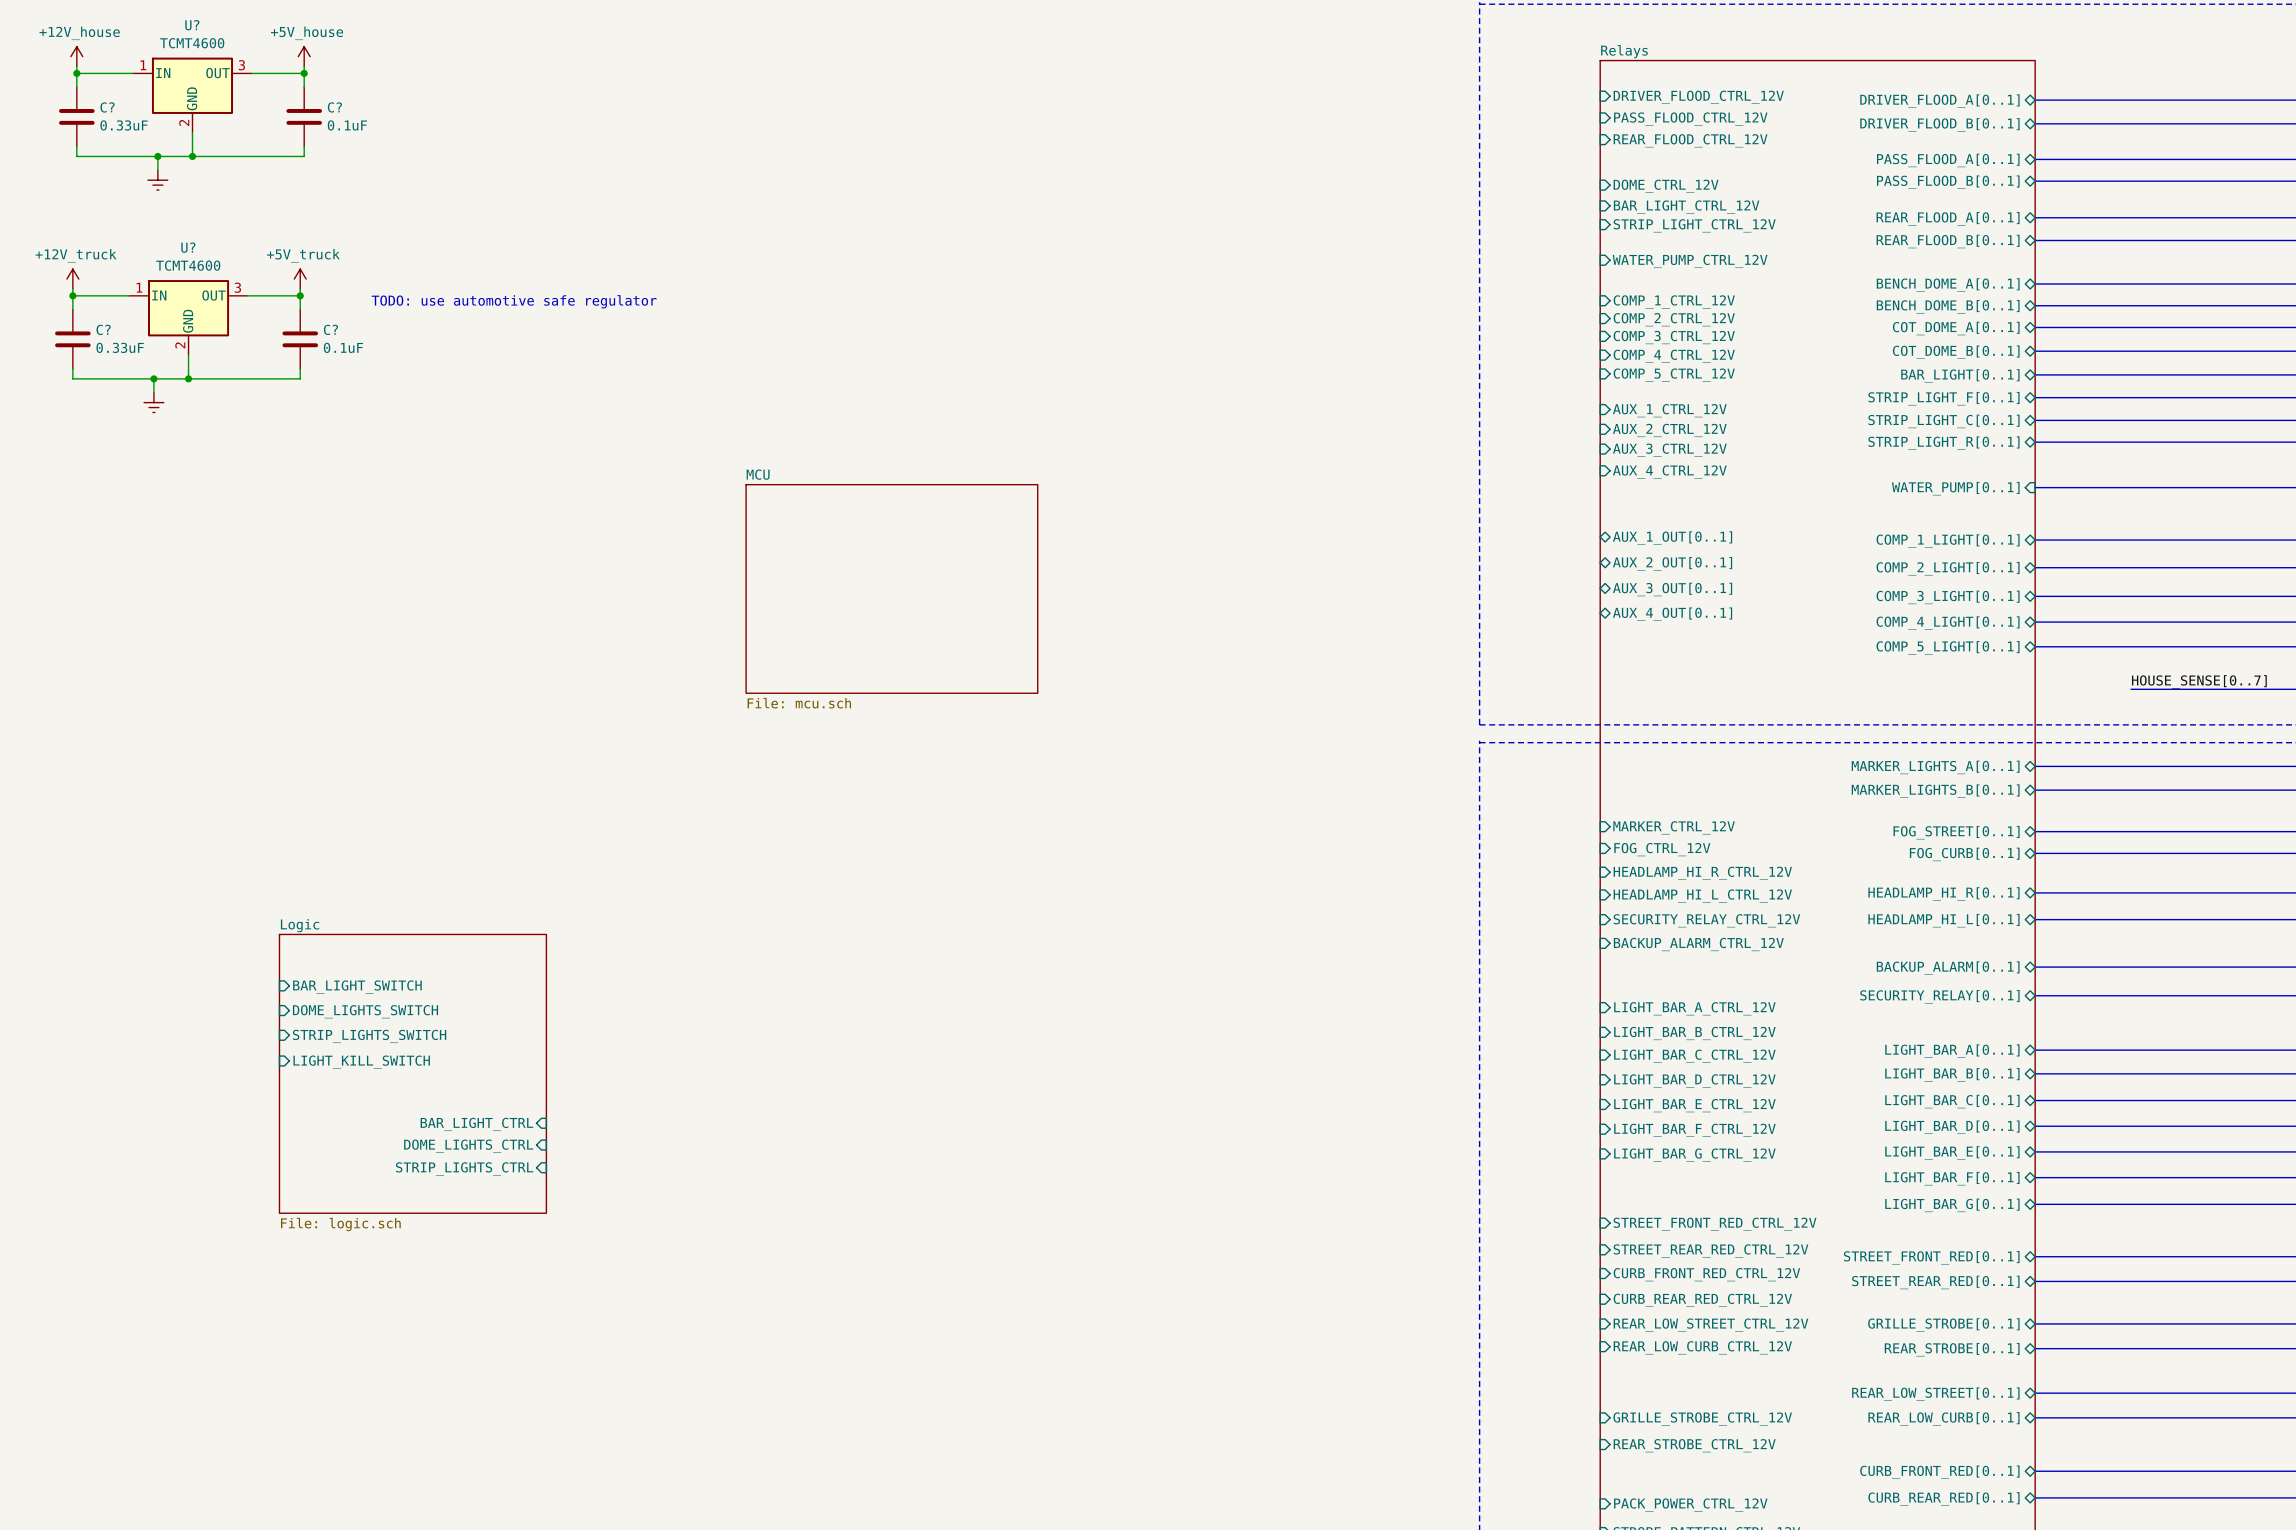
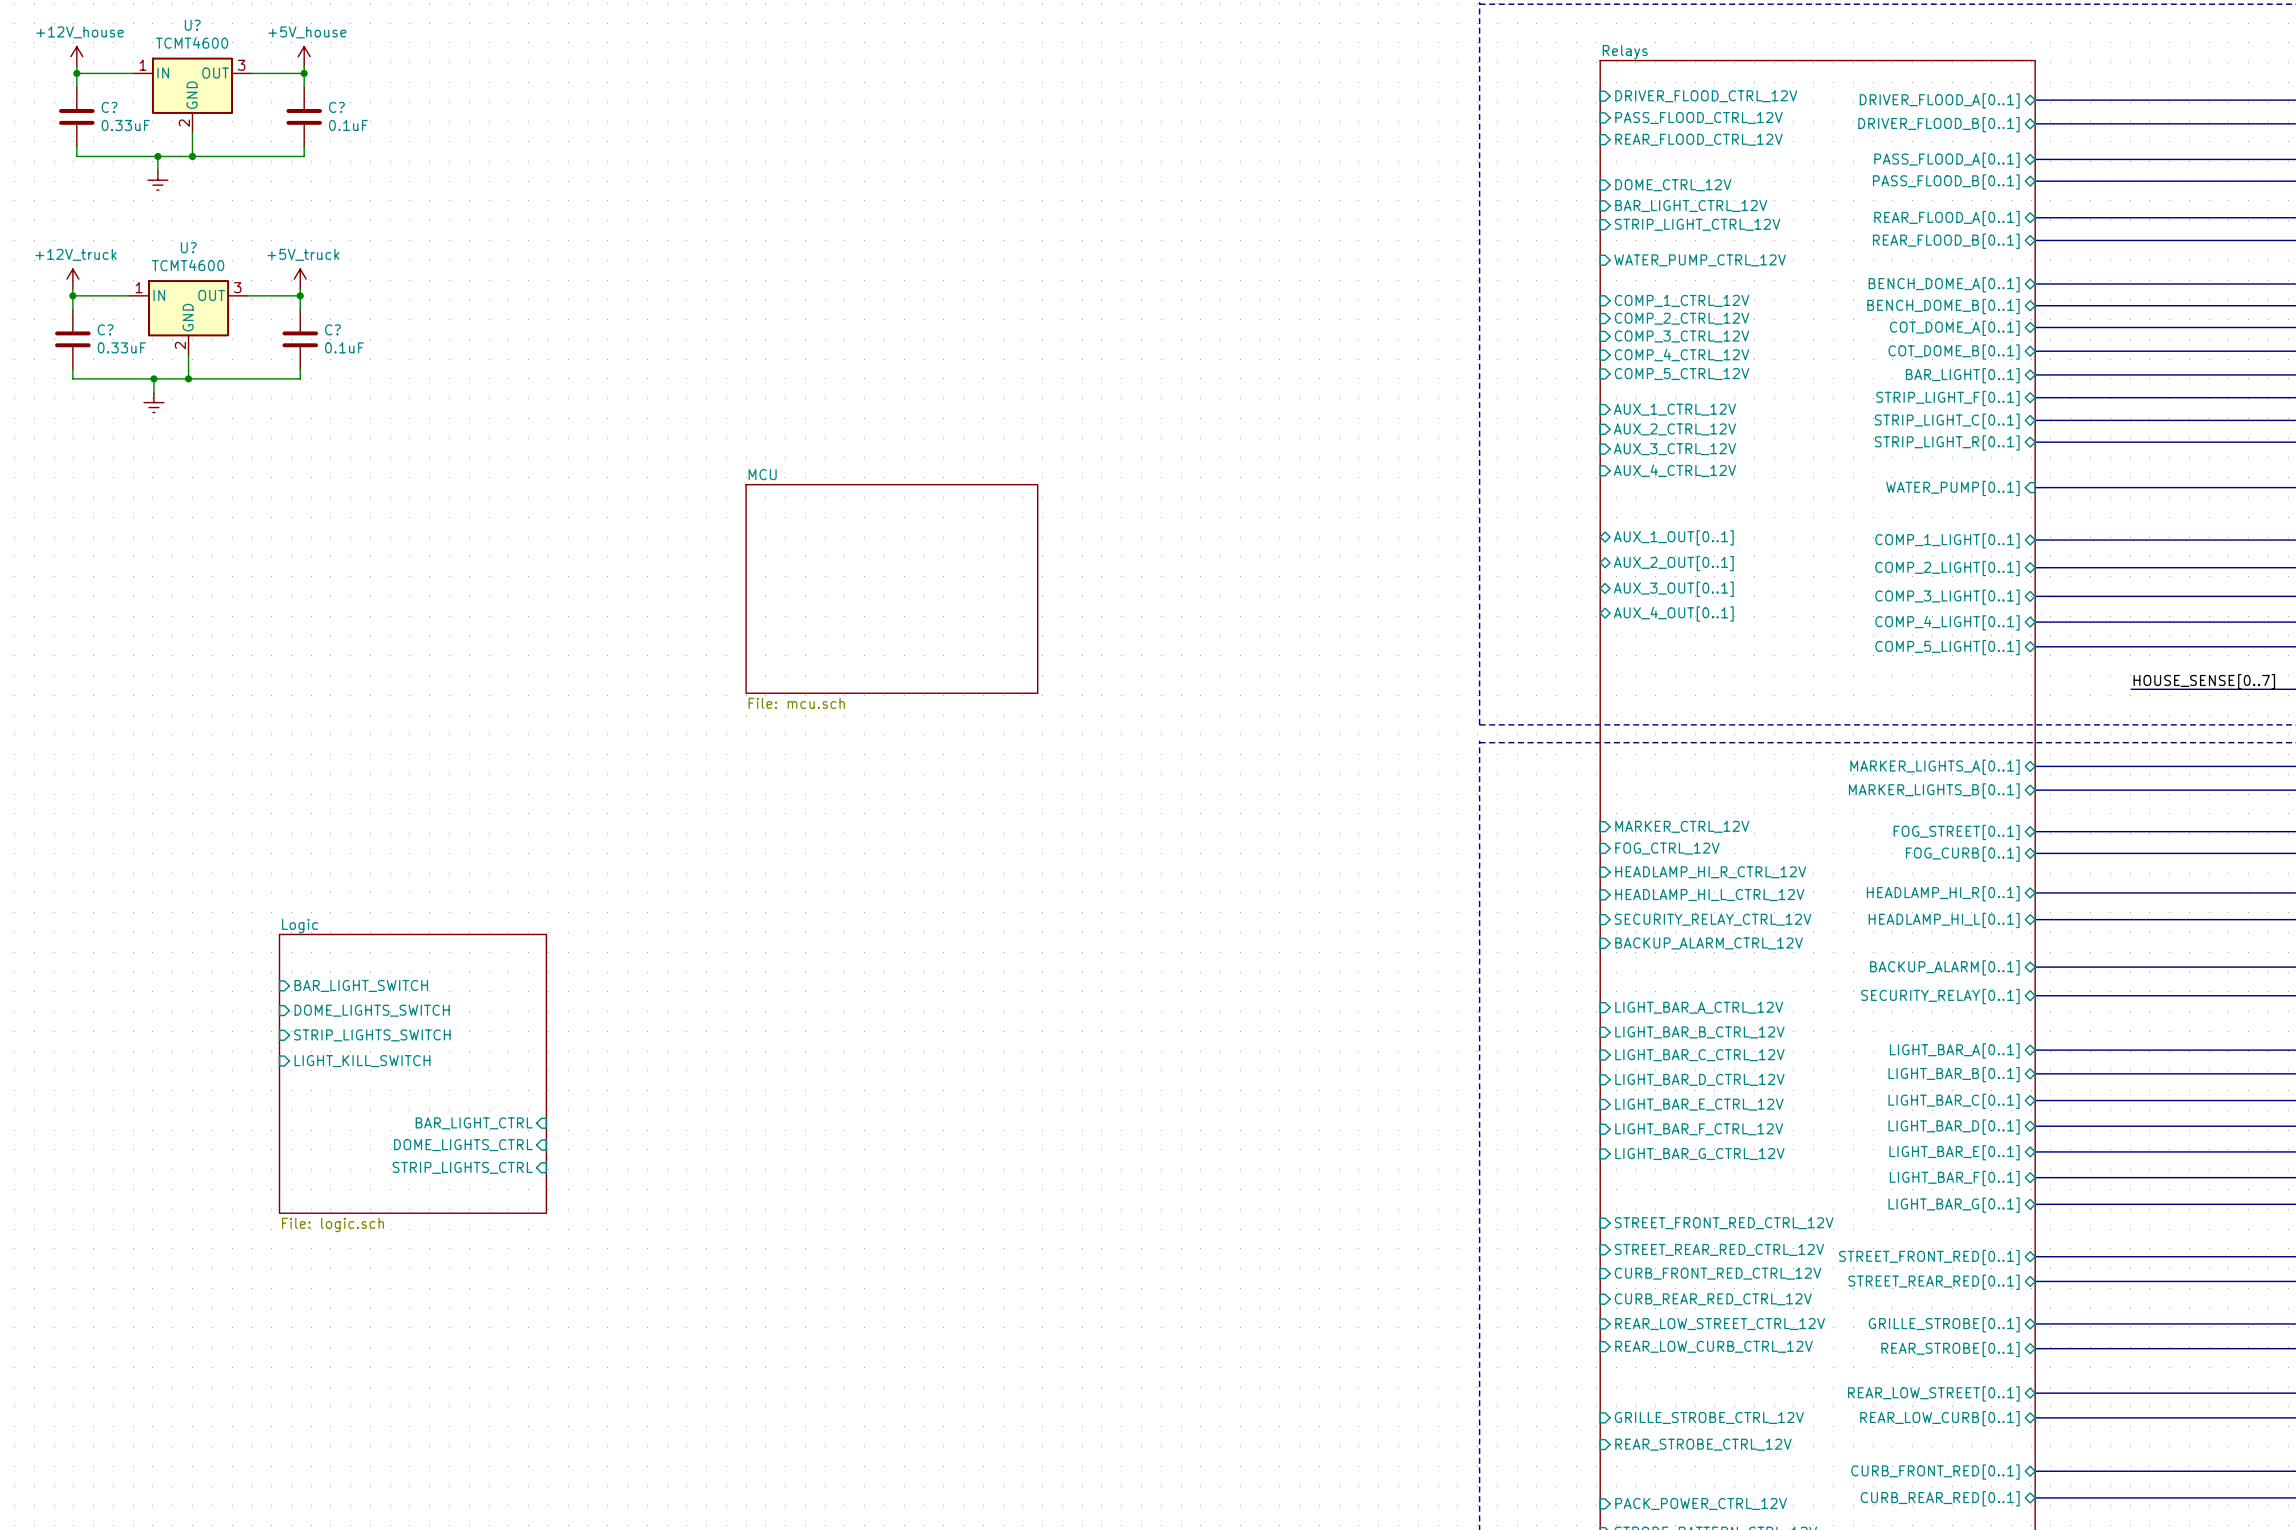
text: TODO: use automotive safe regulator (514, 301) -> none

